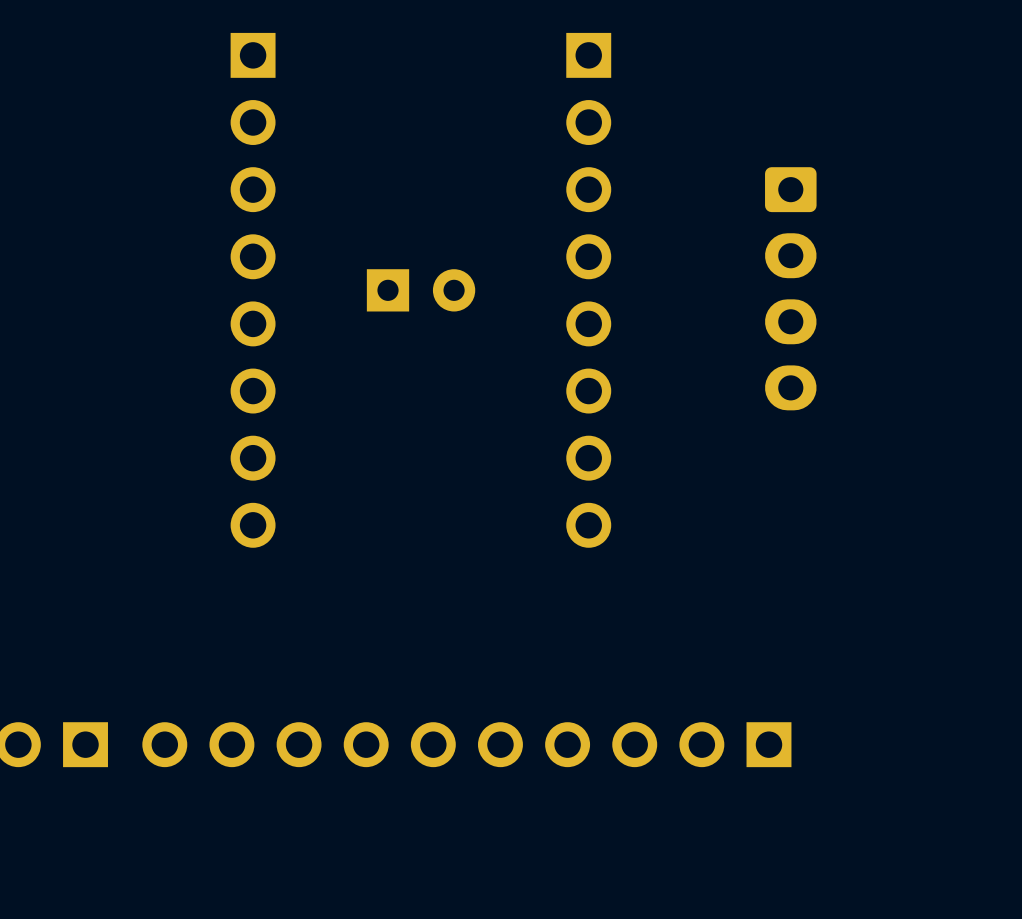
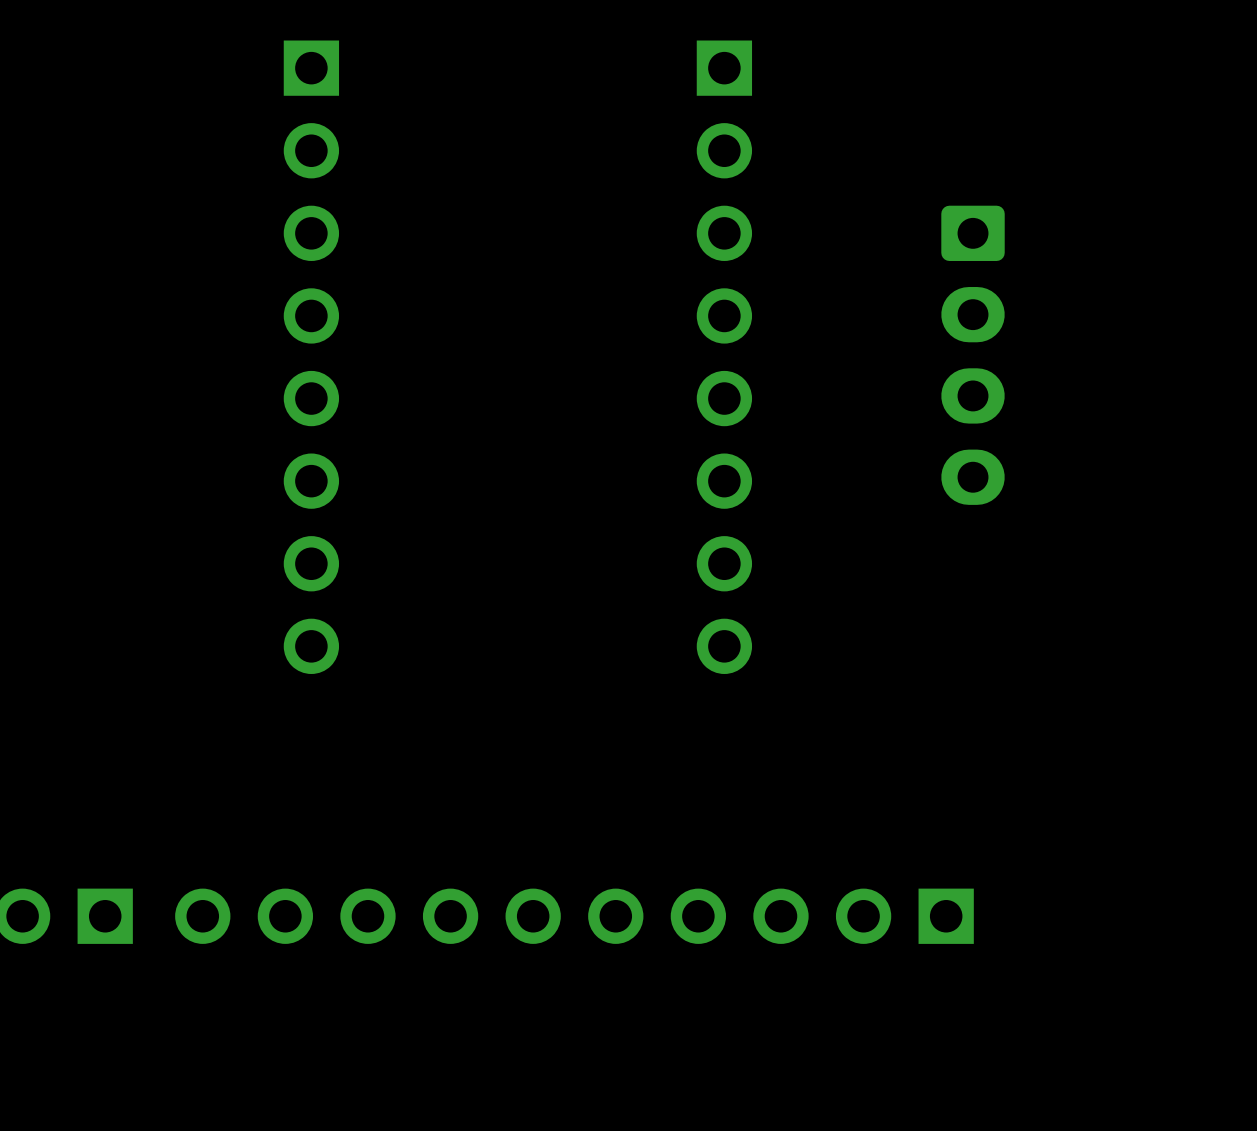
part: (421, 290) -> none

